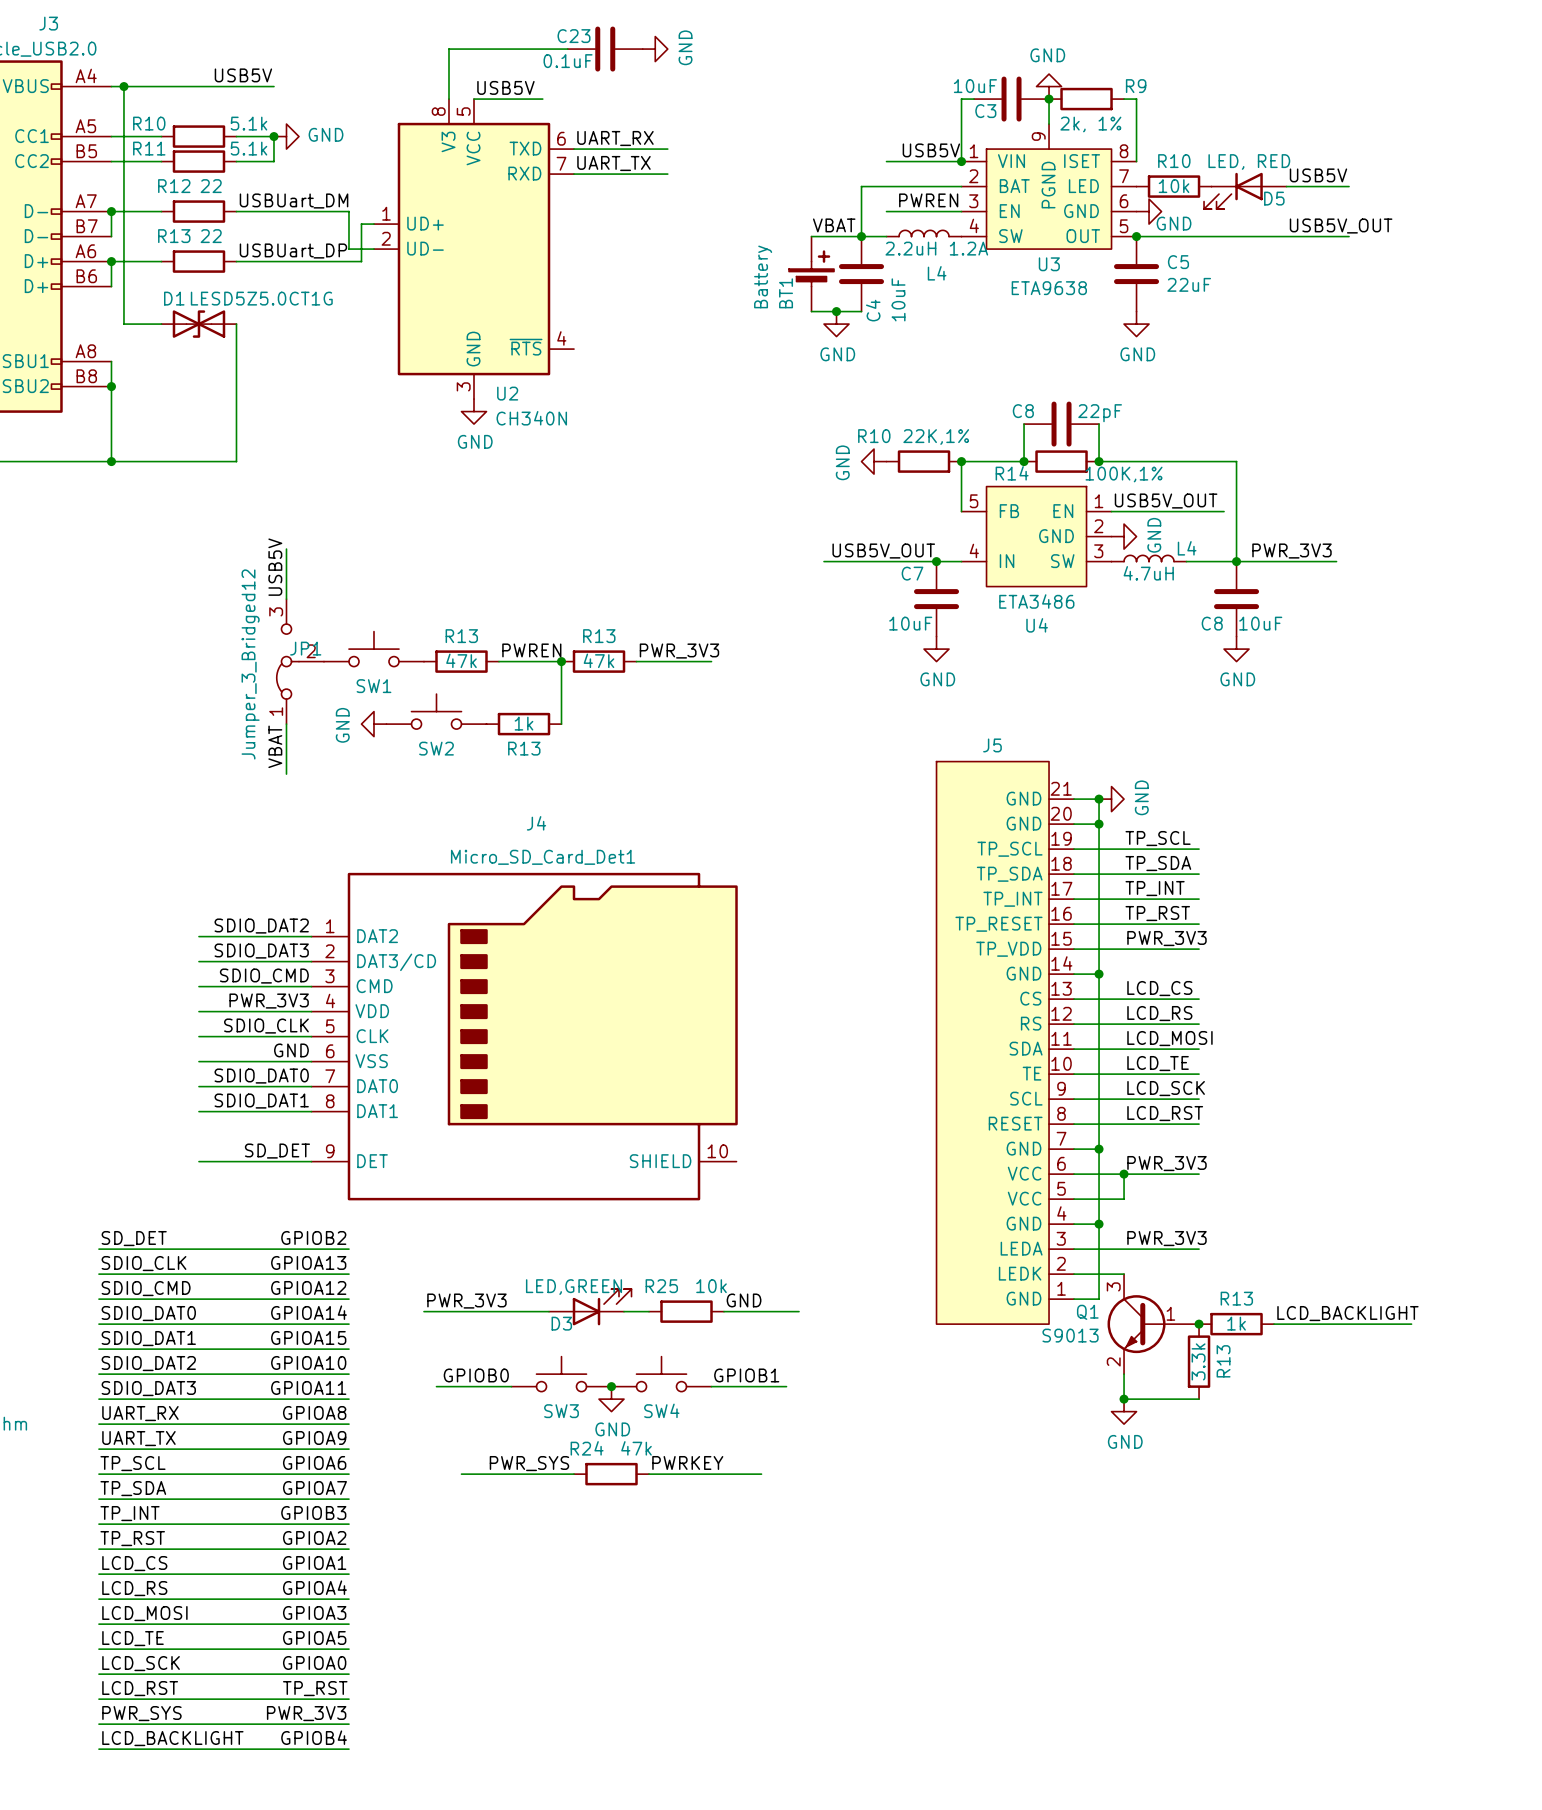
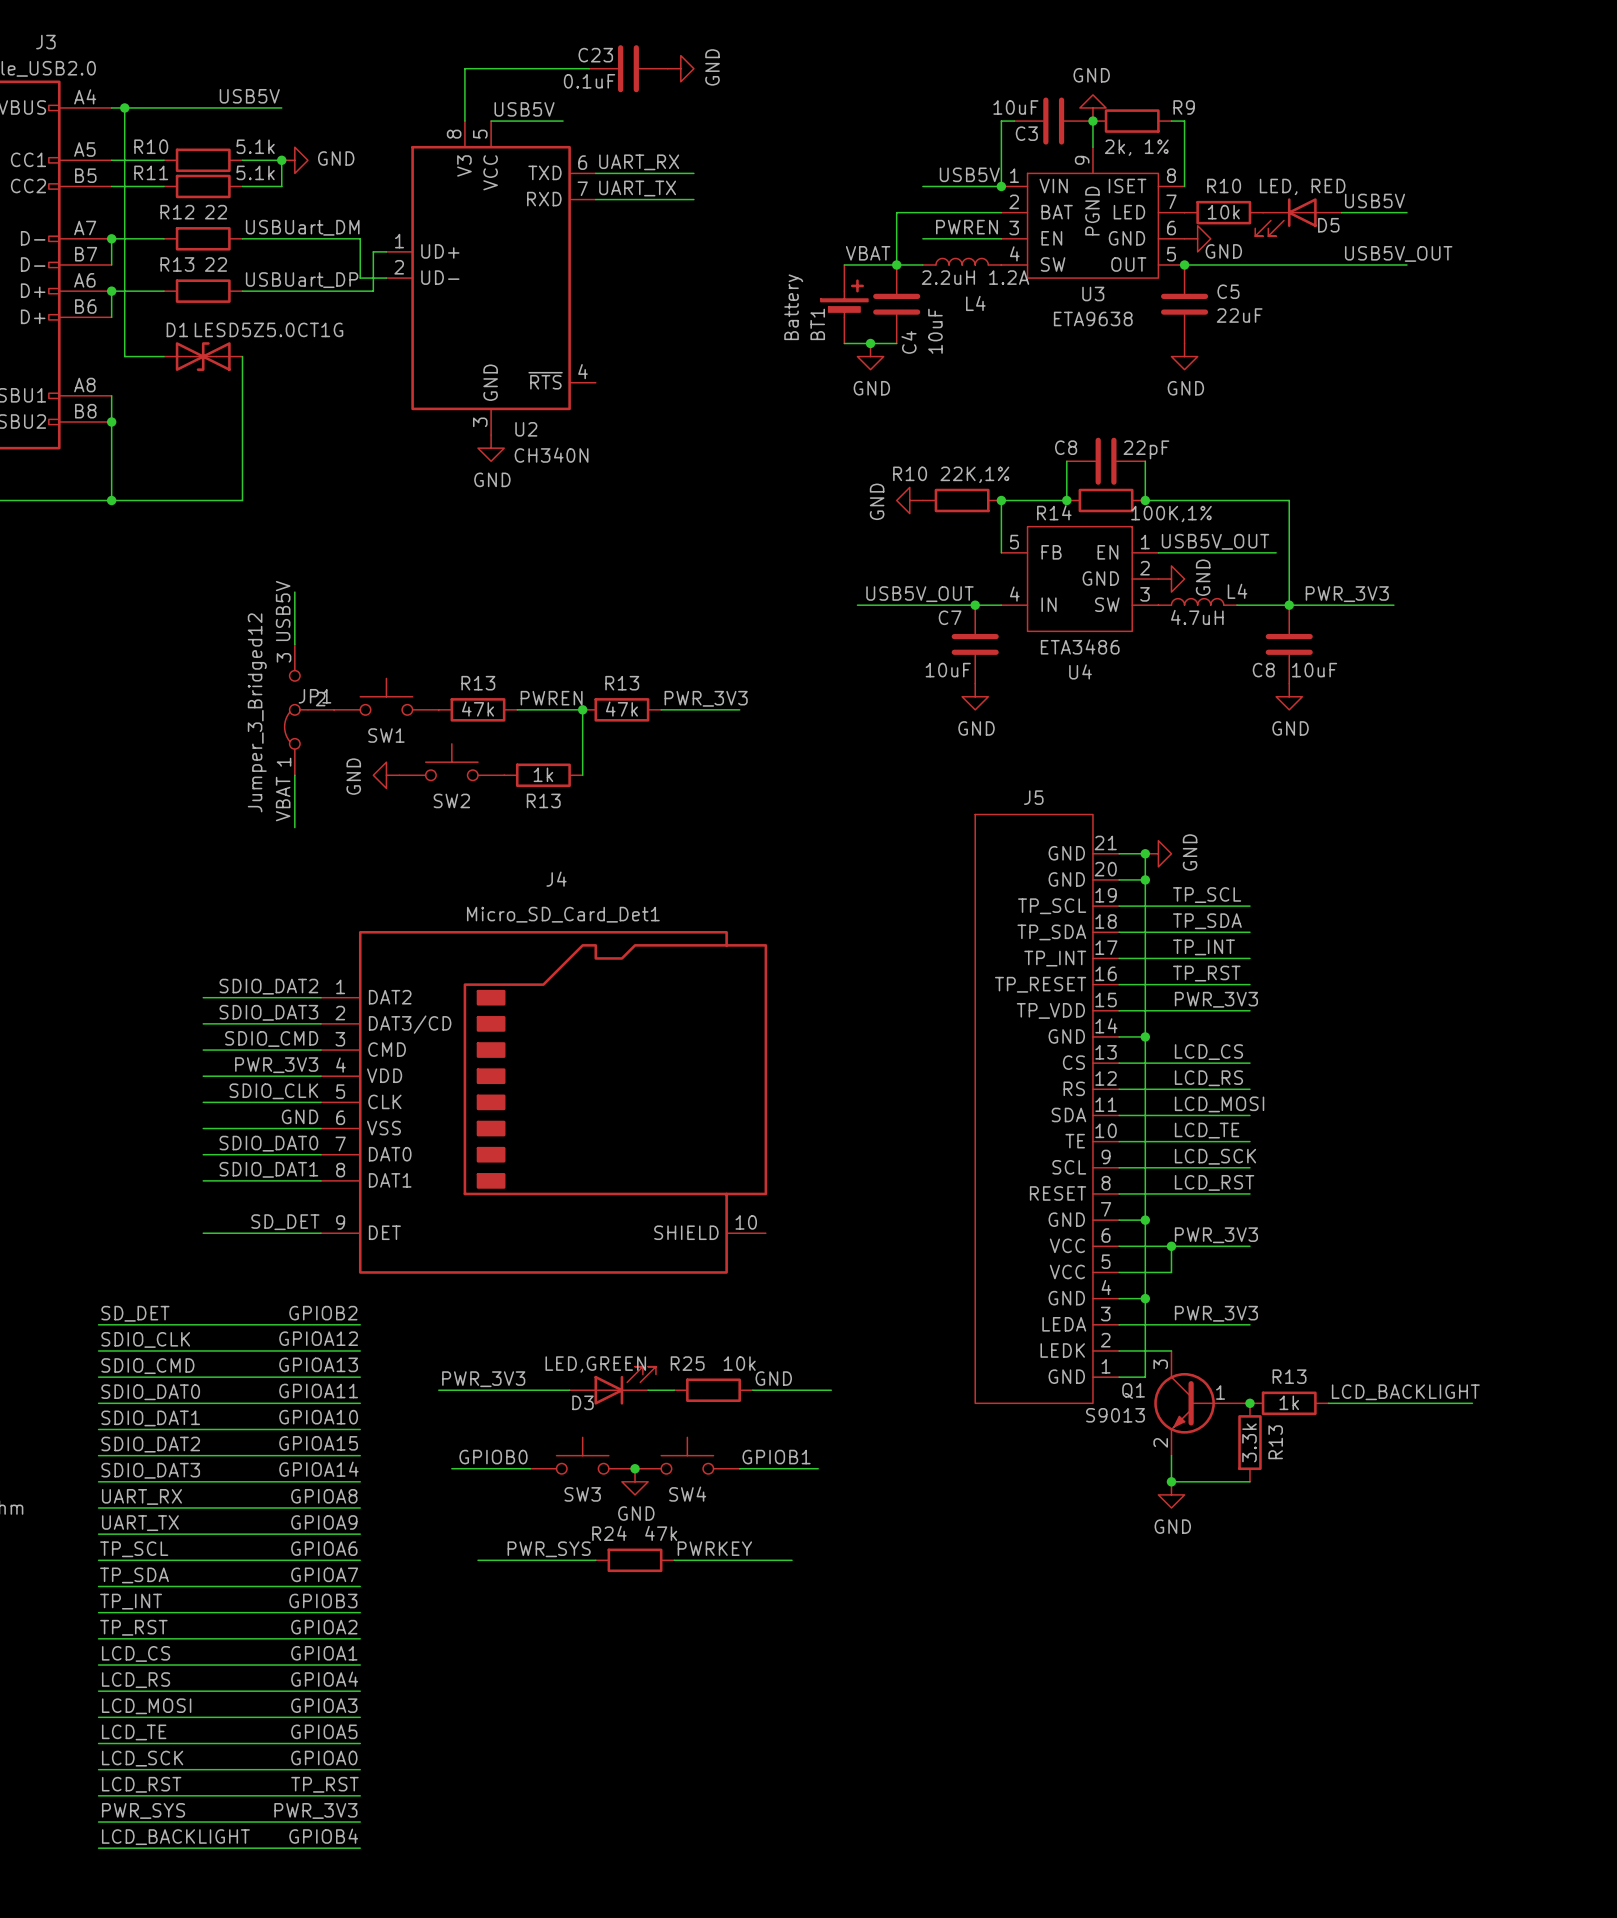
label: GPIOA13 (308, 1262) -> GPIOA12 (318, 1338)
label: GPIOA12 (308, 1287) -> GPIOA13 (318, 1364)
label: GPIOA14 (309, 1312) -> GPIOA11 (318, 1391)
label: GPIOA15 (308, 1337) -> GPIOA10 (318, 1417)
label: GPIOA10 (308, 1362) -> GPIOA15 (318, 1443)
label: GPIOA11 (308, 1387) -> GPIOA14 (318, 1469)

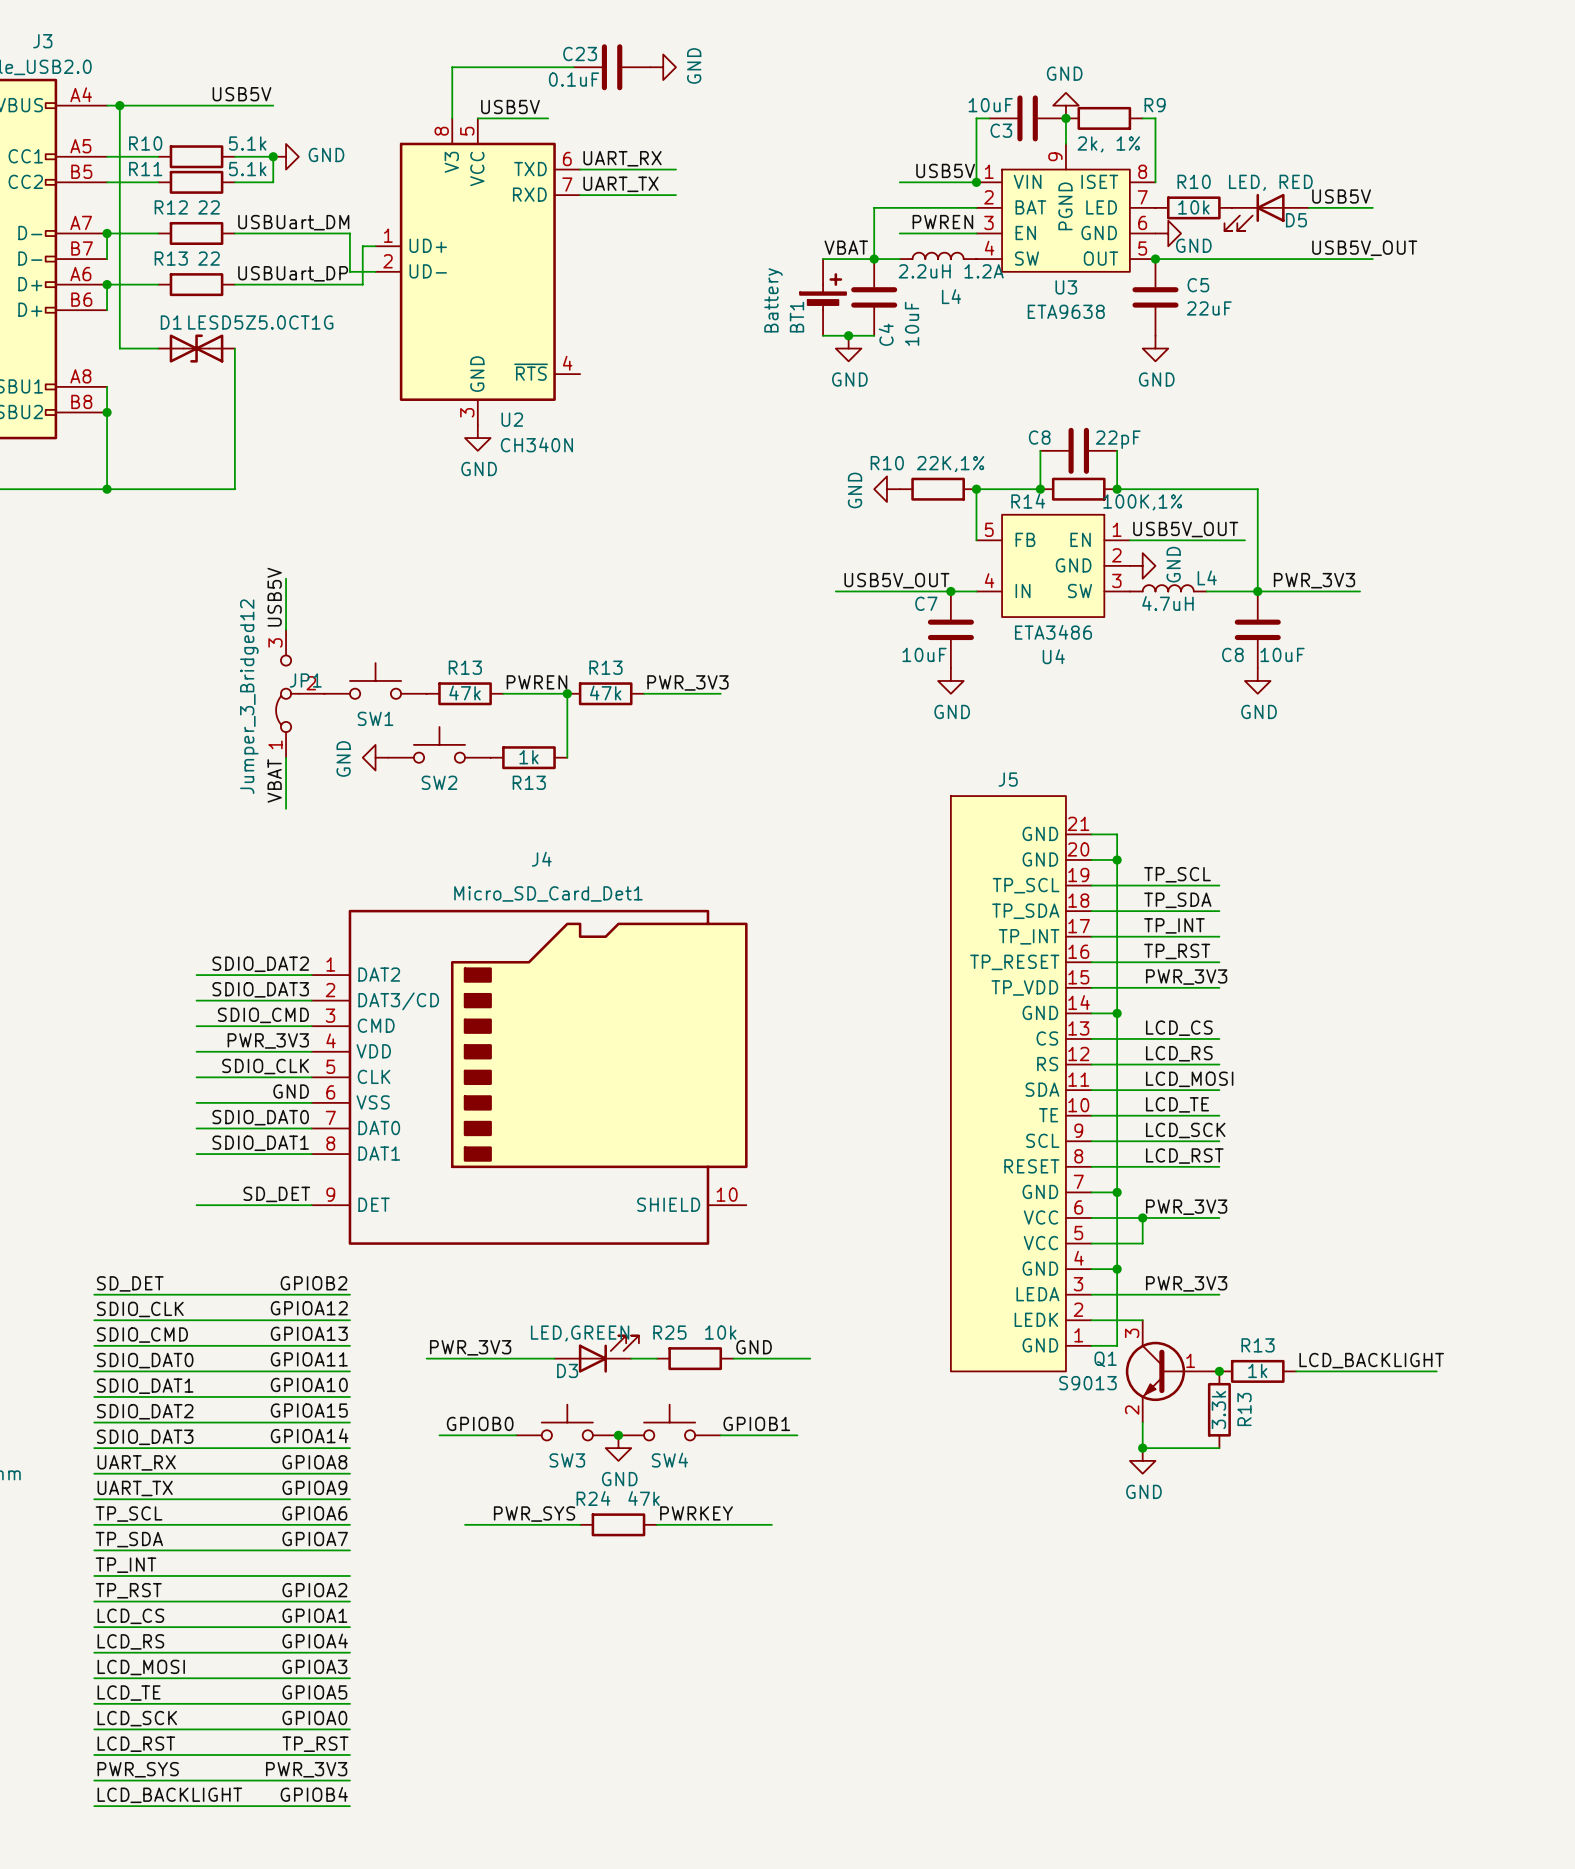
junction: (1145, 853) -> none
power symbol: GND (1158, 853) -> none
label: GPIOB3 (323, 1600) -> none

